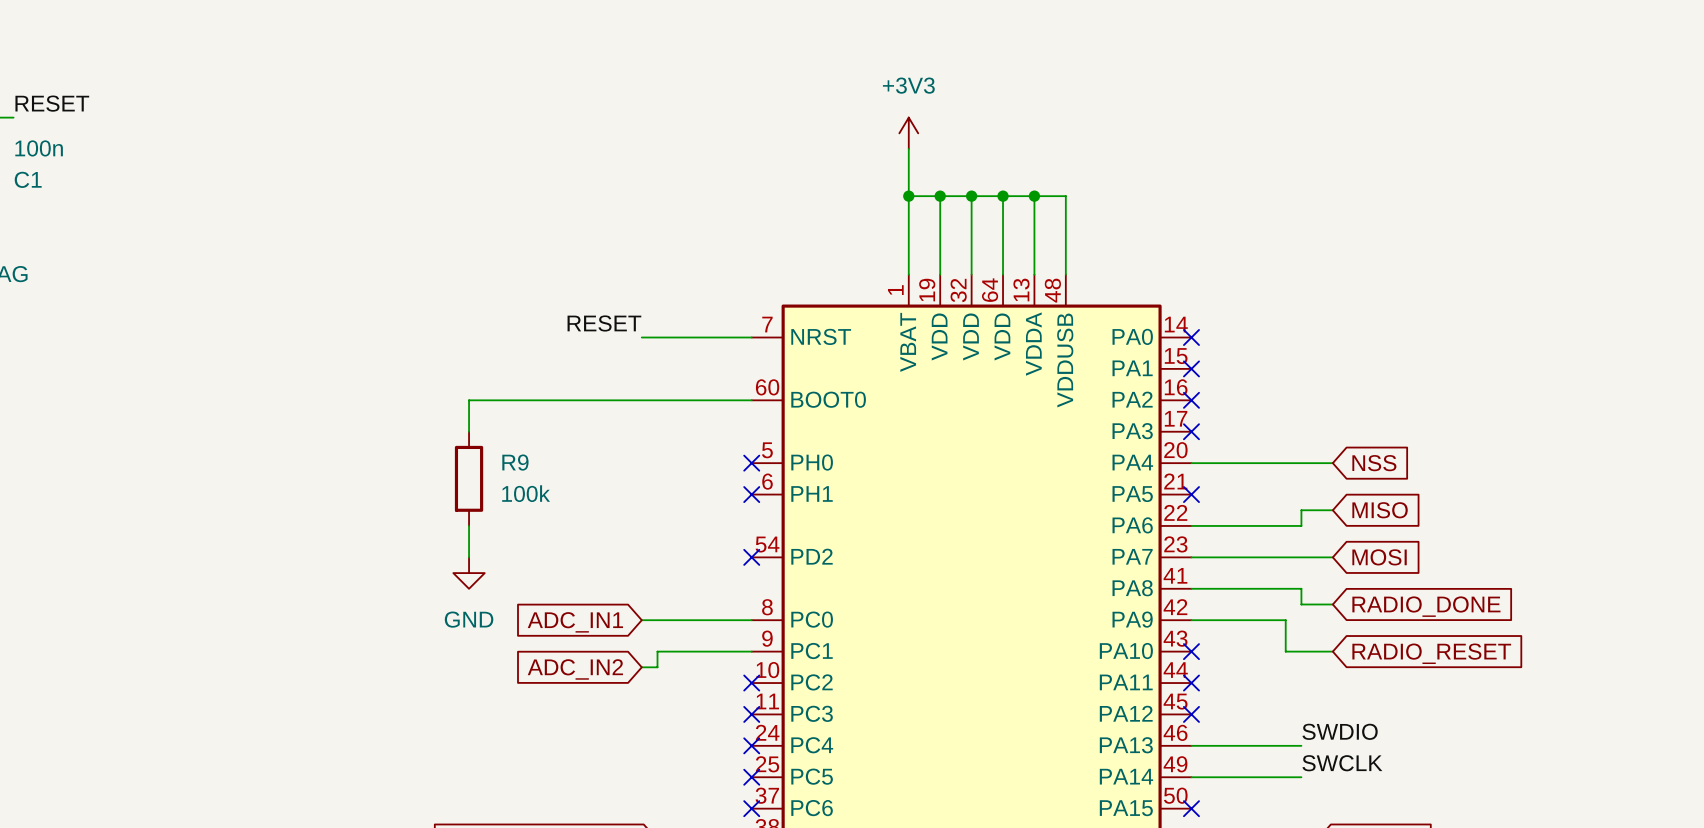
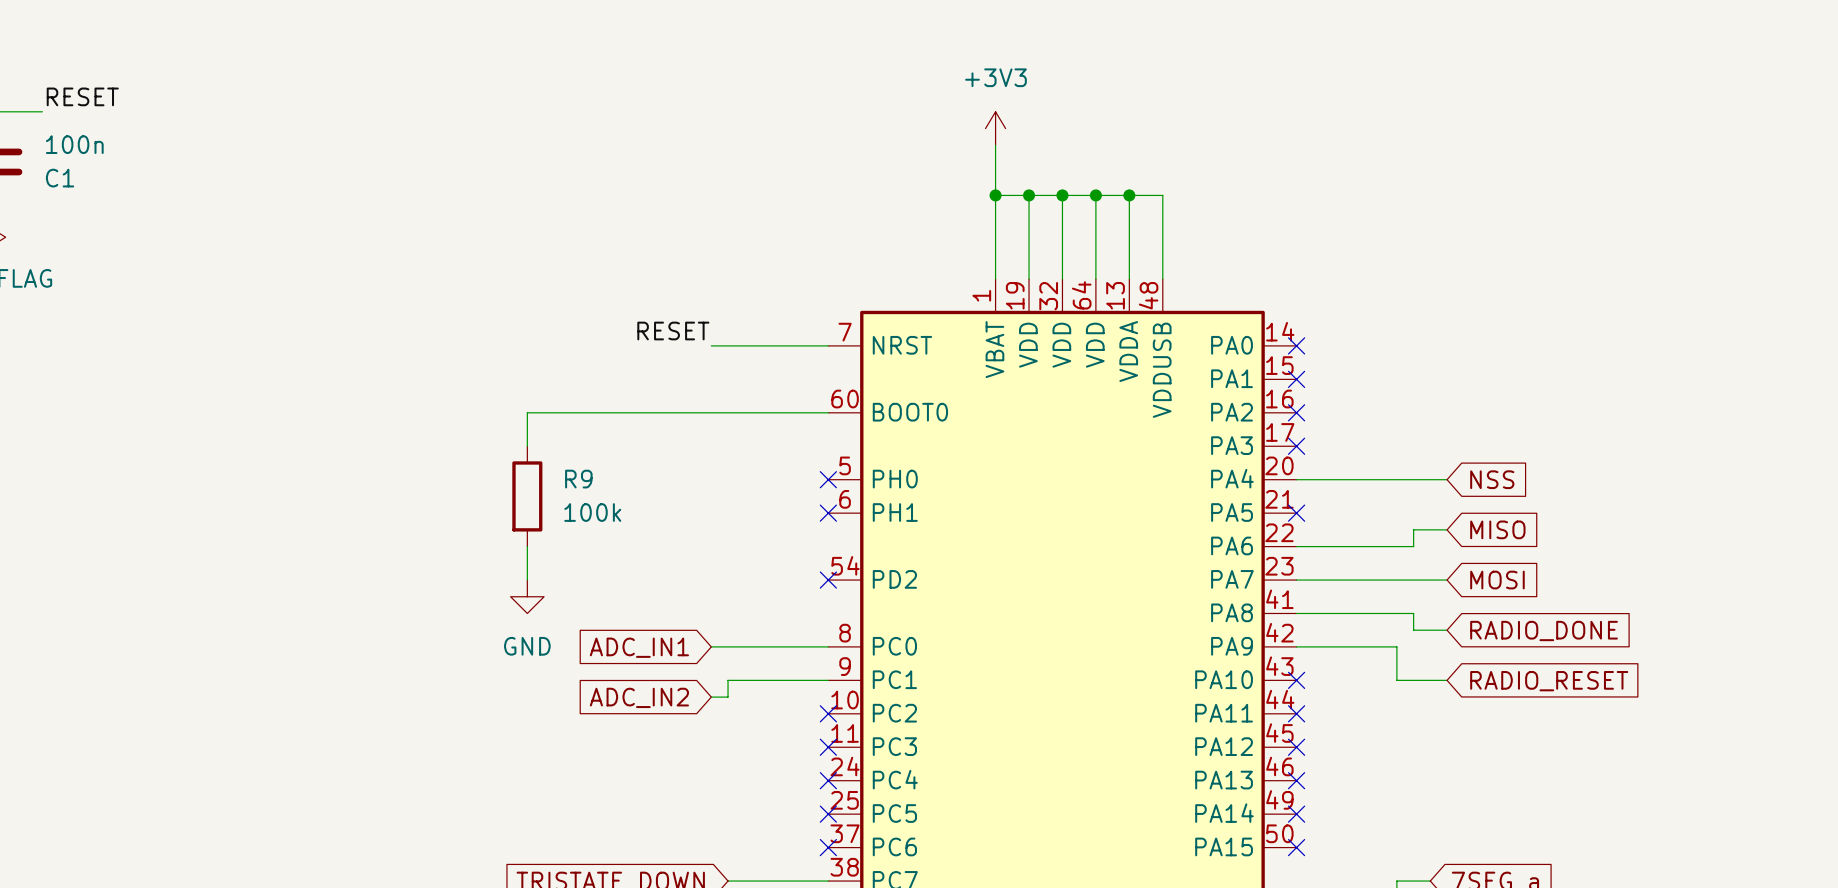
label: SWDIO (1340, 731) -> none
wire: (1191, 745) (1301, 745) -> none
no-connect mark: none -> (1296, 780)
label: SWCLK (1342, 763) -> none
wire: (1191, 777) (1301, 777) -> none
no-connect mark: none -> (1296, 814)

